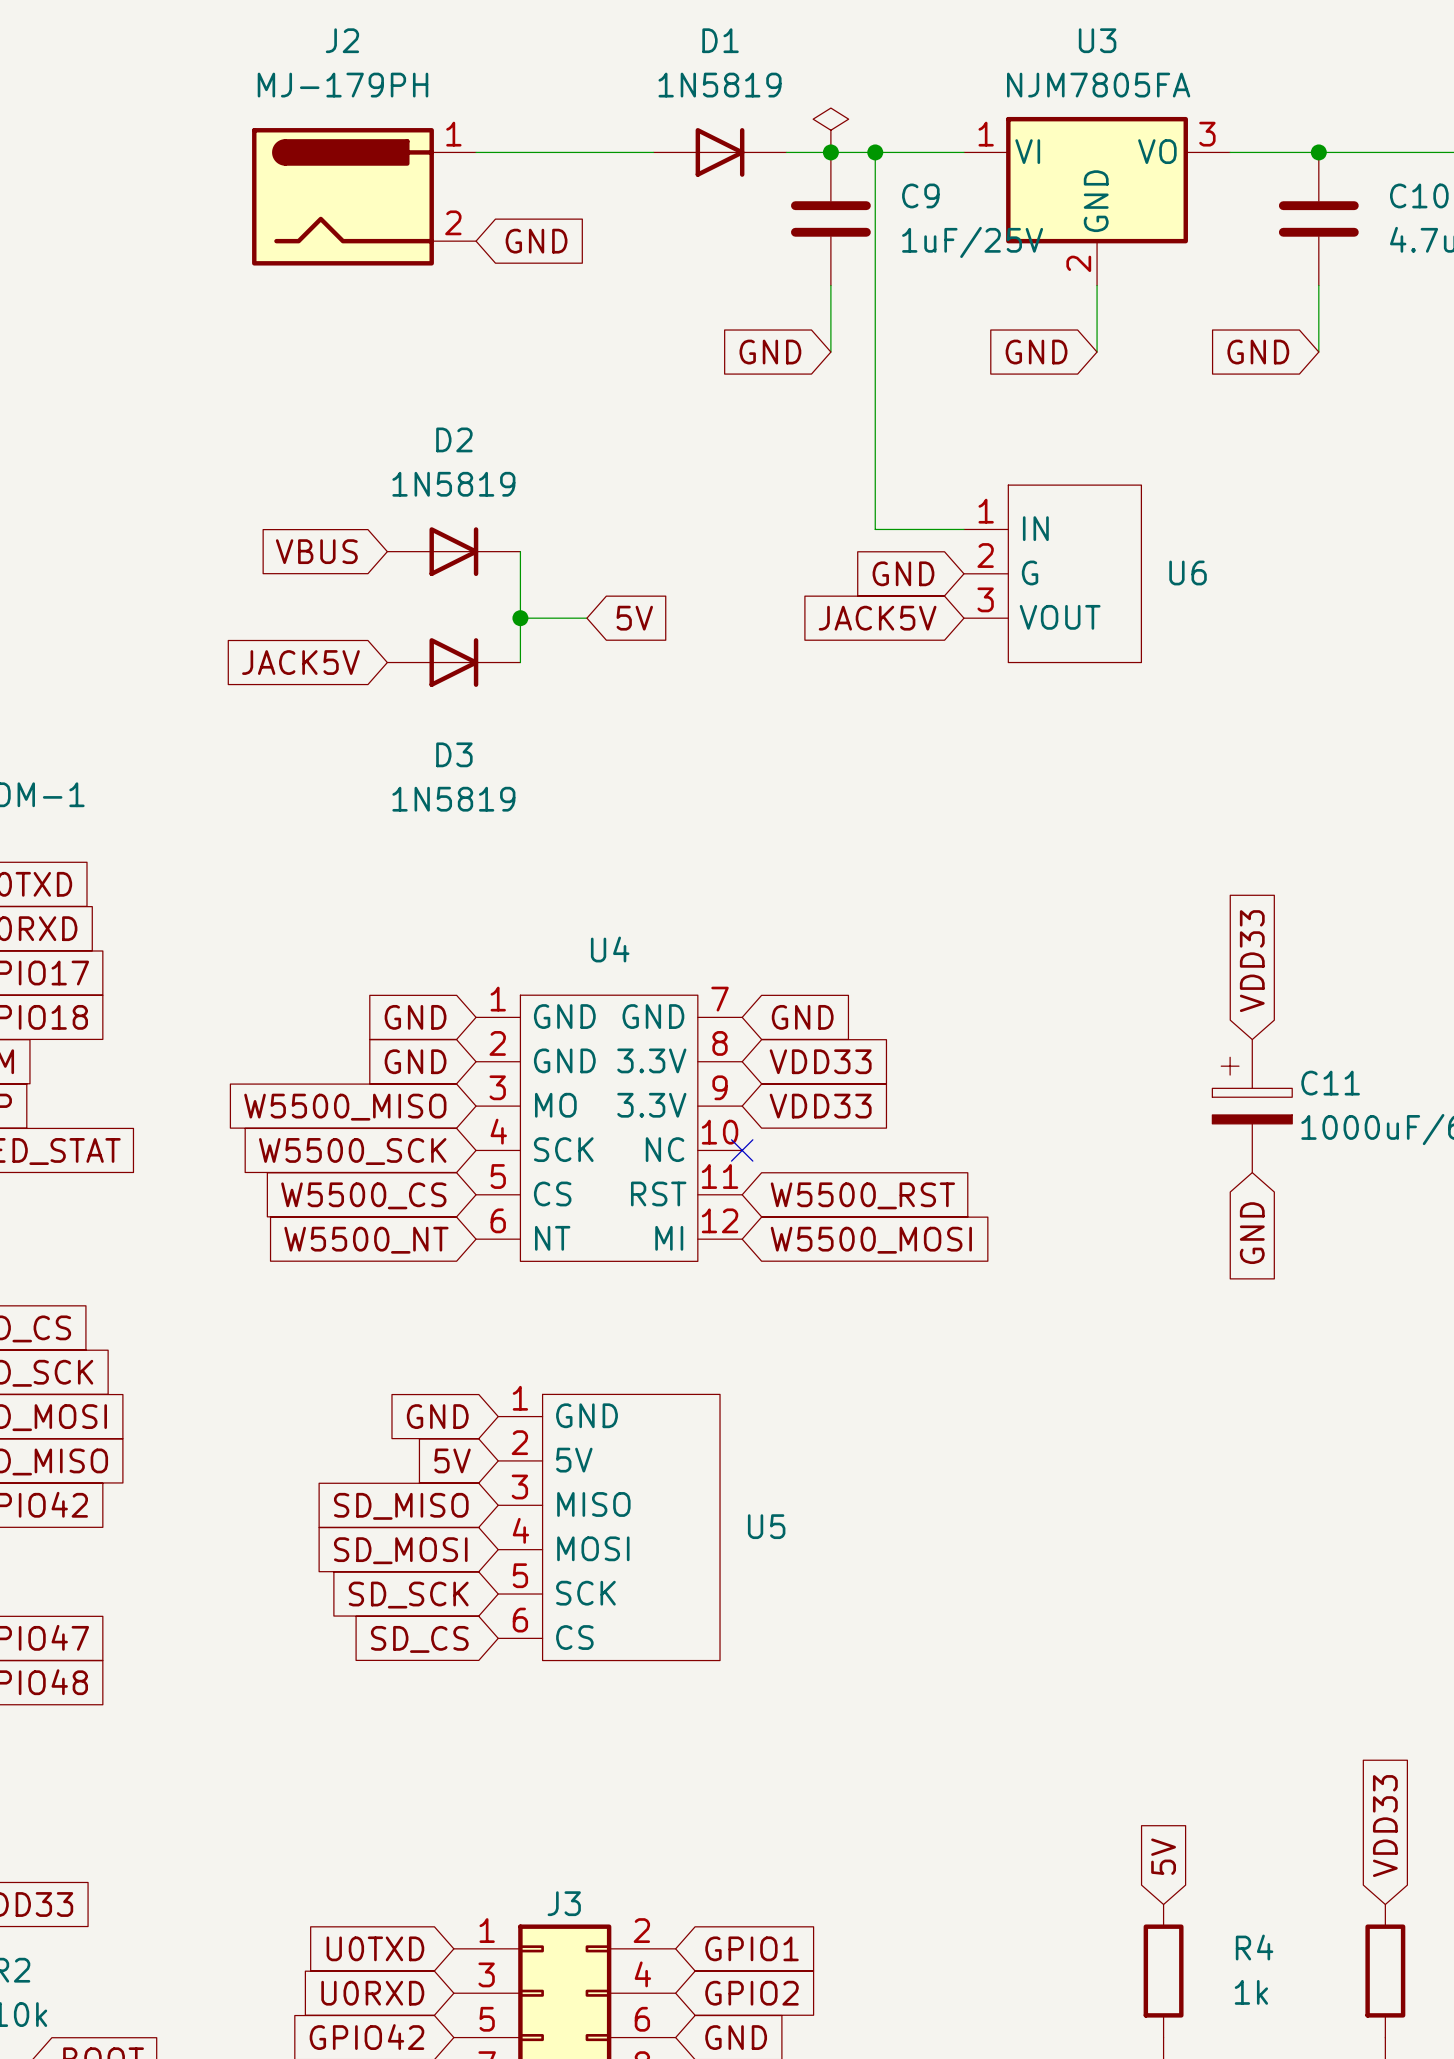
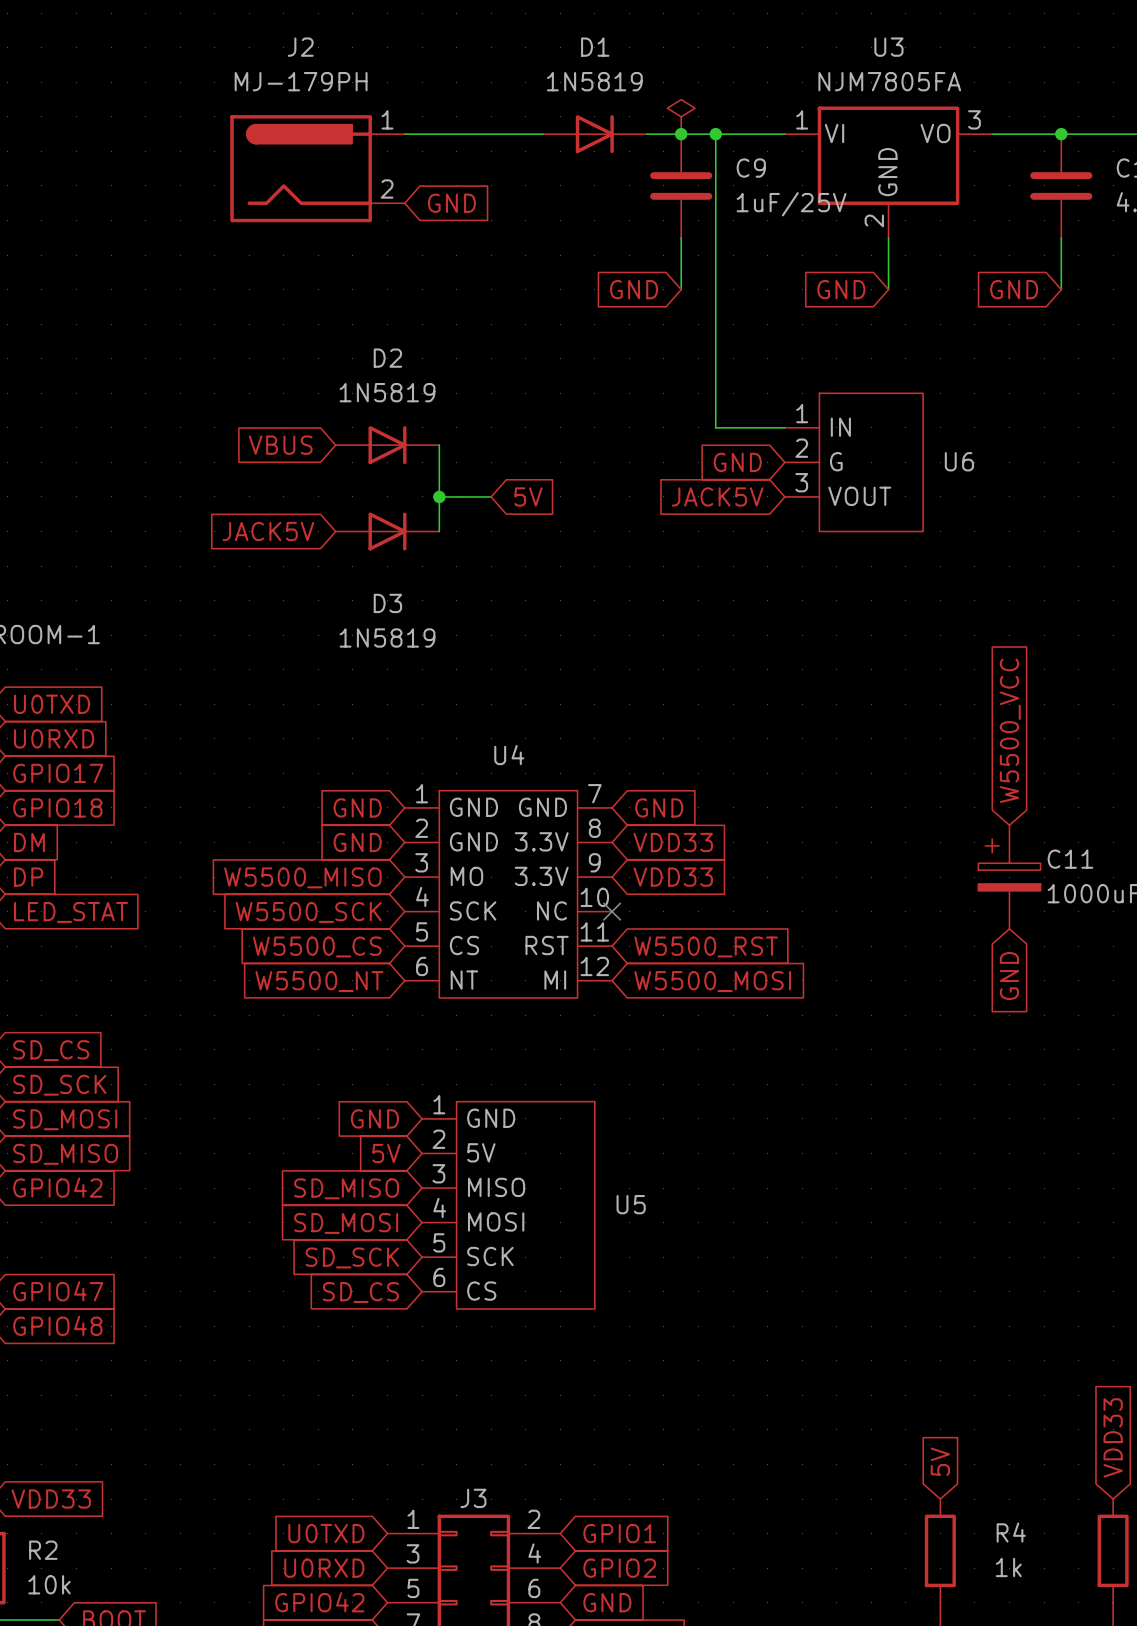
global label: VDD33 (1252, 961) -> W5500_VCC (1010, 730)

